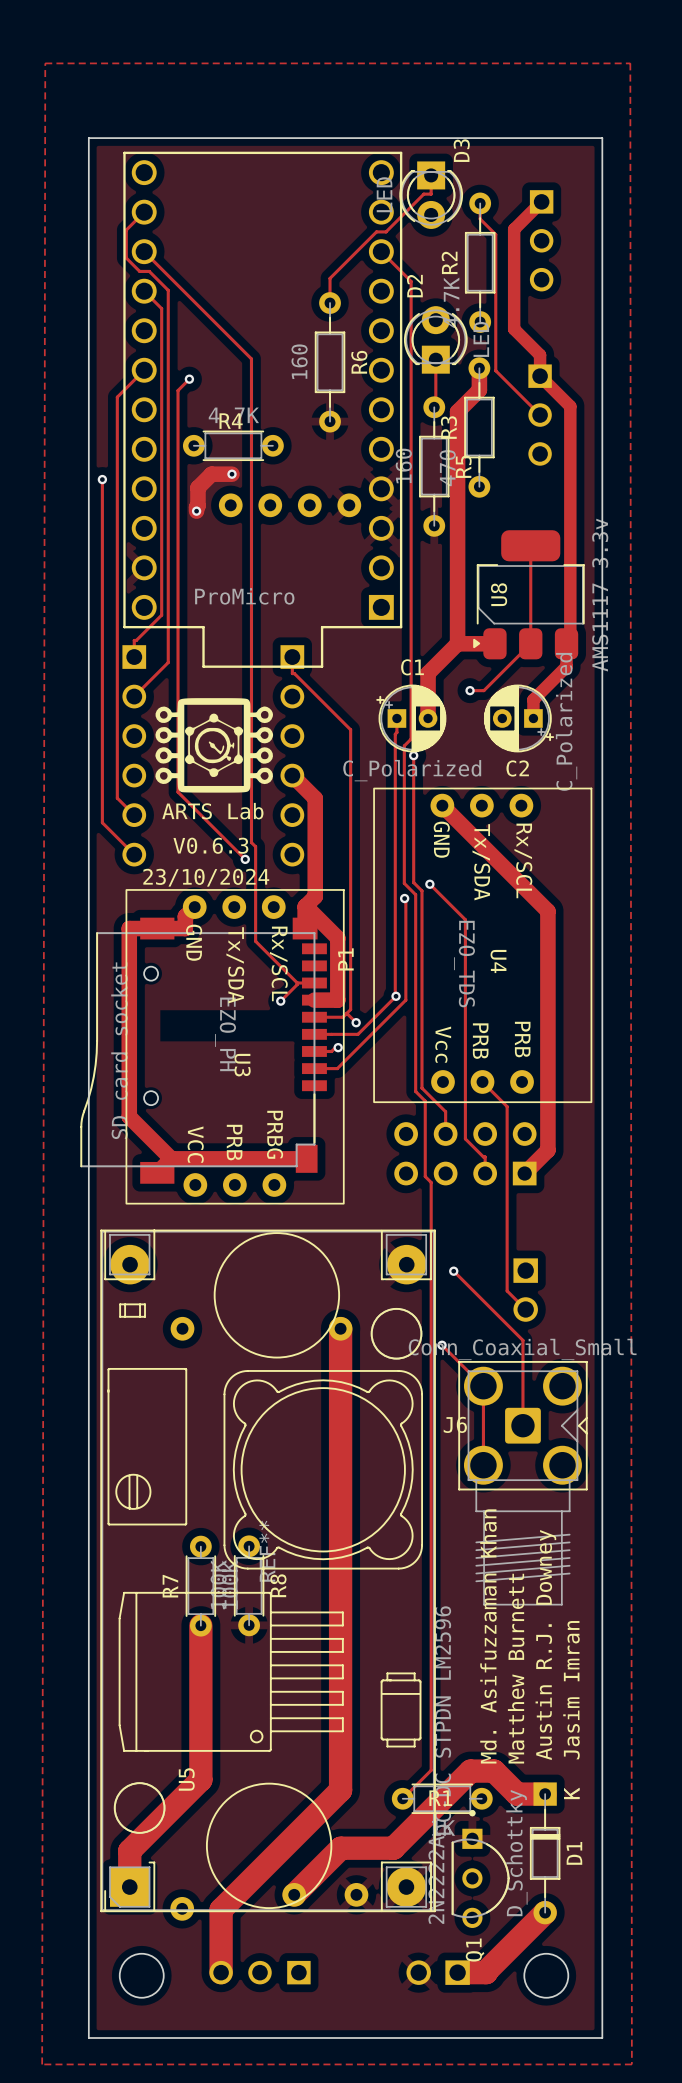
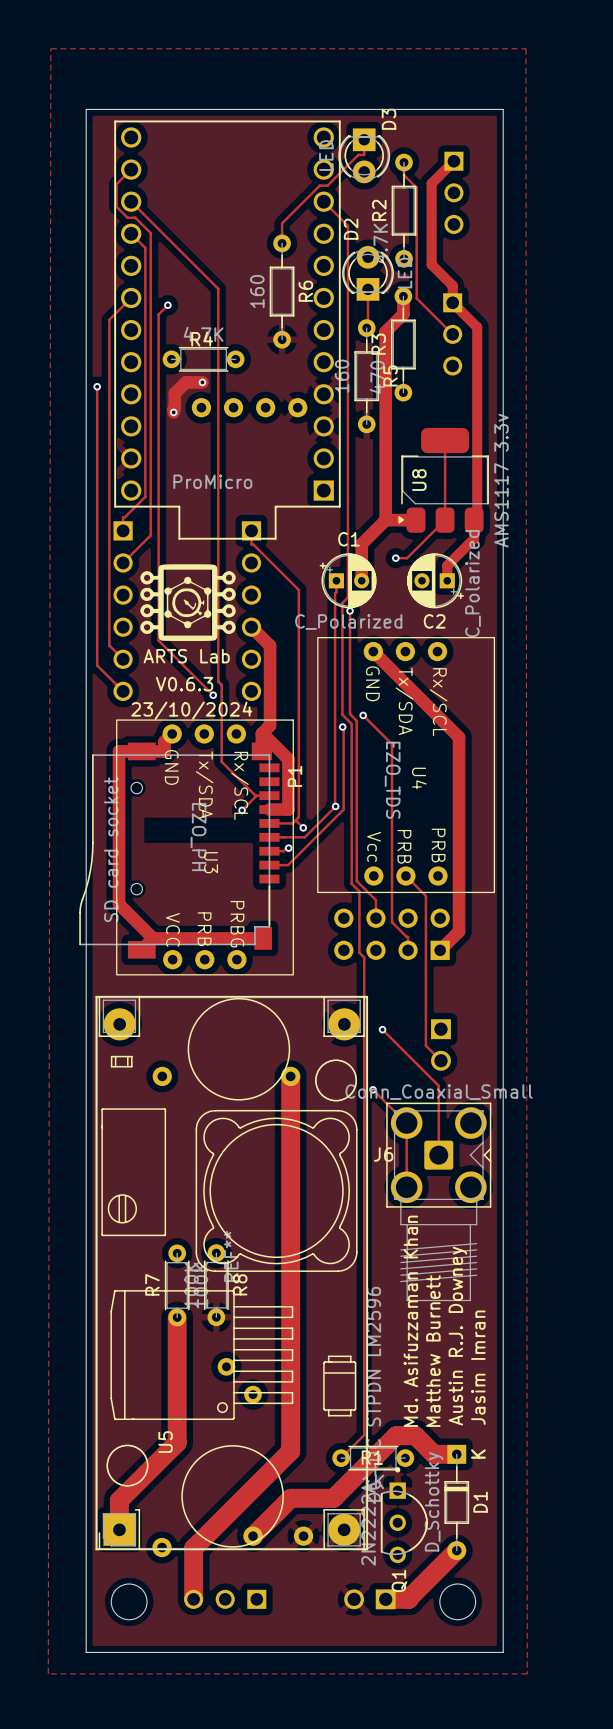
part: none -> (226, 1366)
part: none -> (253, 1394)

